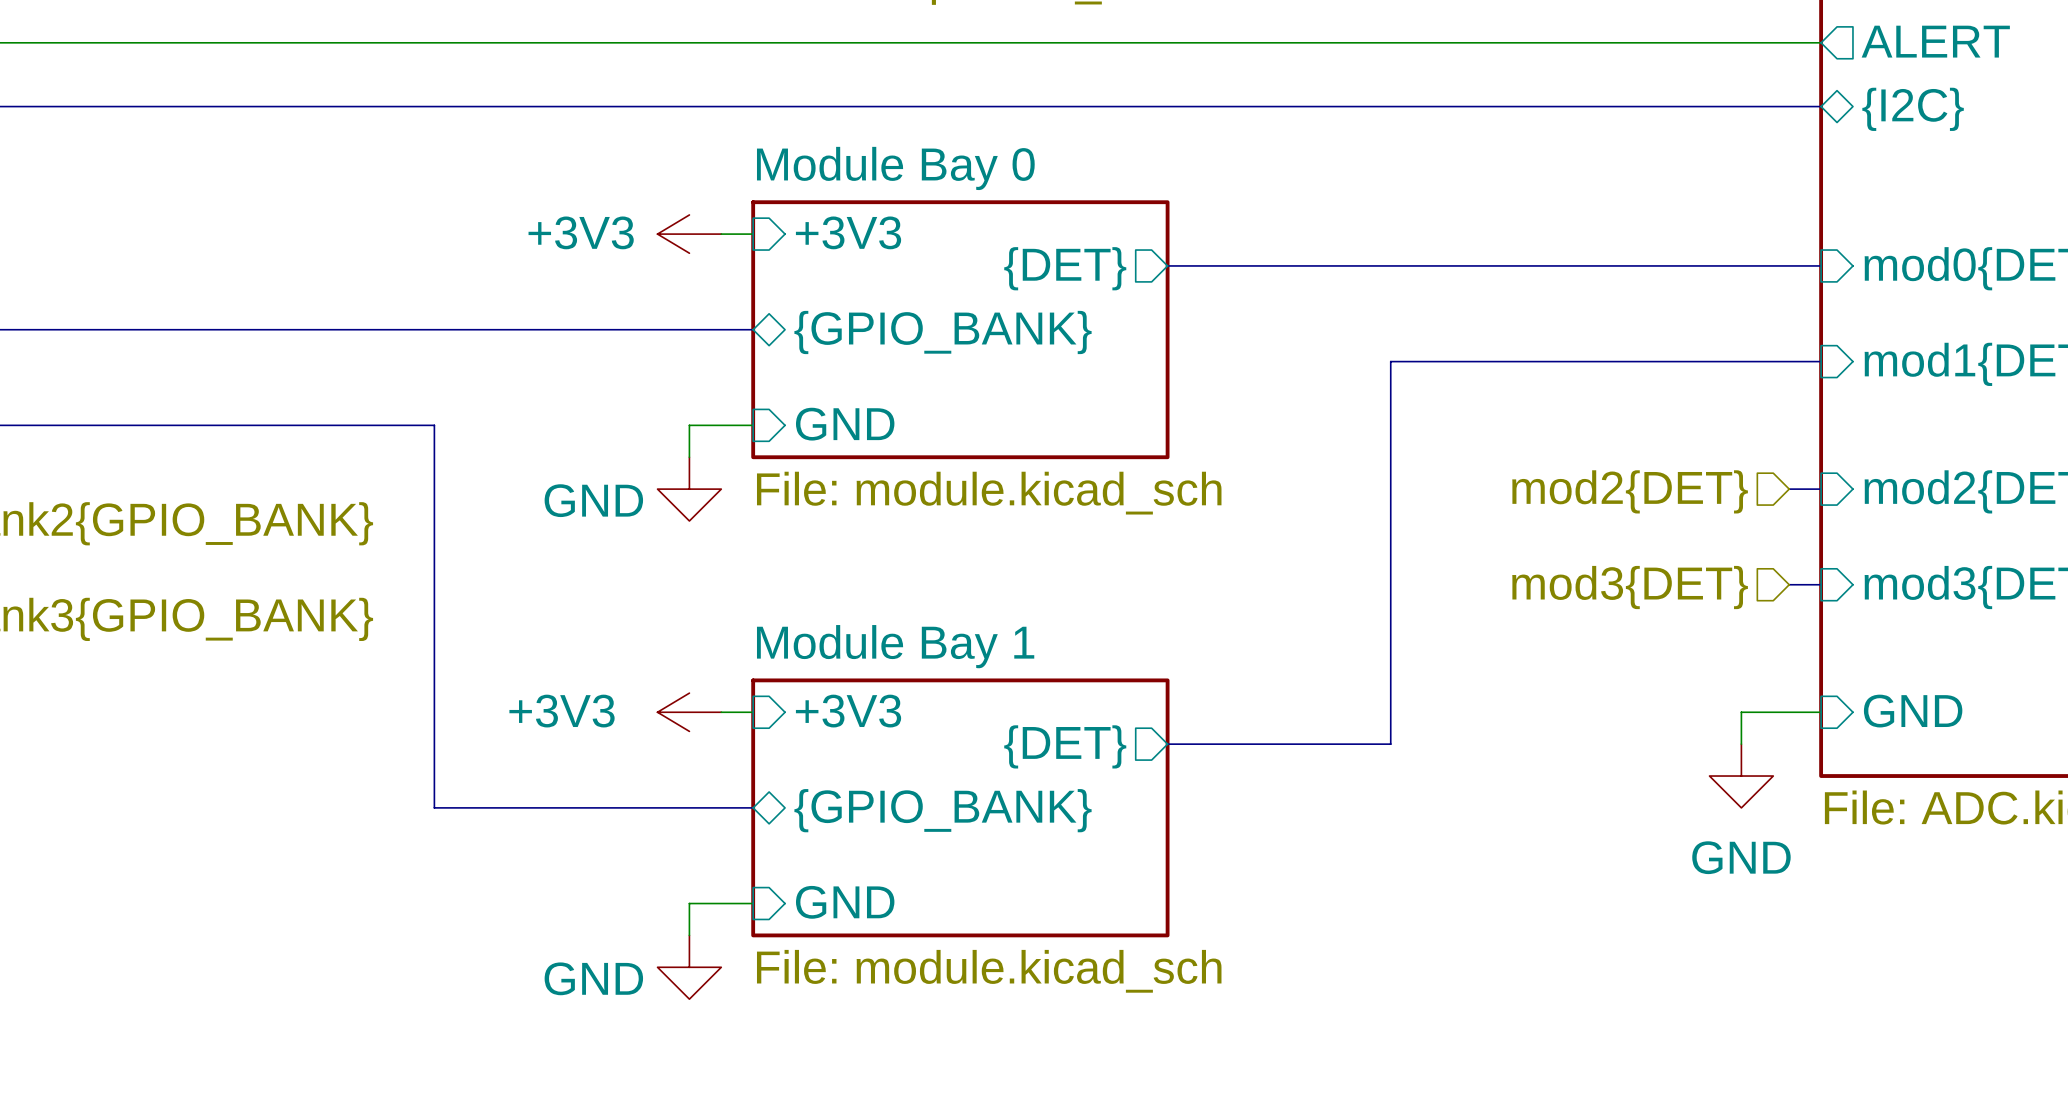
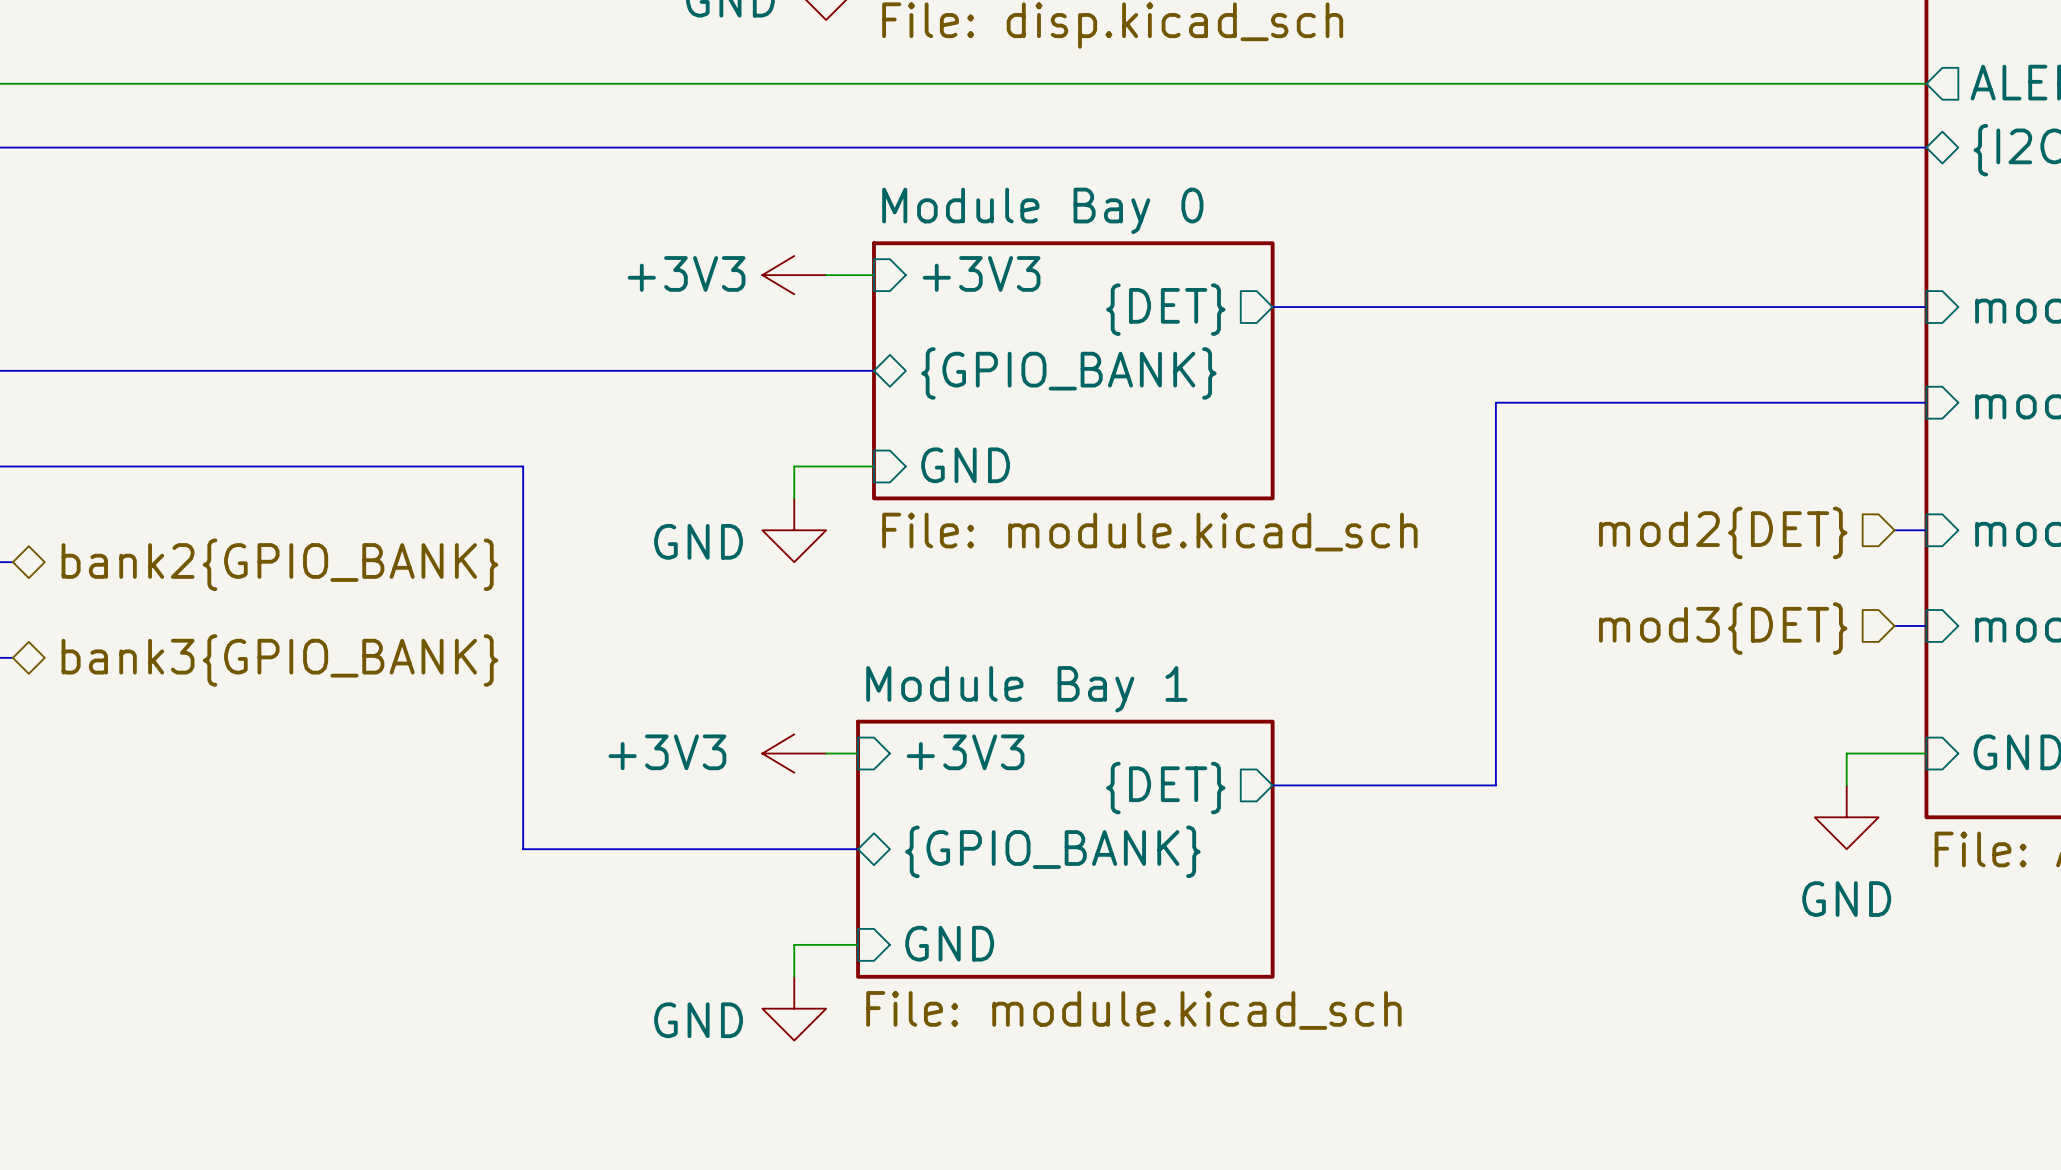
sheet Module Bay 0 name position: Module Bay 0 (895, 168) -> Module Bay 0 (1042, 210)
sheet Module Bay 0 shape: [751, 200, 1170, 460] -> [872, 241, 1275, 501]
sheet pin position: +3V3 (848, 232) -> +3V3 (981, 273)
wire: none -> (858, 275) (873, 275)
bus: none -> (858, 370) (873, 370)
sheet pin position: {GPIO_BANK} (943, 332) -> {GPIO_BANK} (1068, 373)
sheet pin position: GND (845, 424) -> GND (965, 465)
bus: (418, 425) (434, 425) (434, 807) -> (523, 466) (523, 849) (539, 849)
wire: none -> (858, 466) (873, 466)
sheet Module Bay 0 value position: File: module.kicad_sch (989, 493) -> File: module.kicad_sch (1149, 532)

